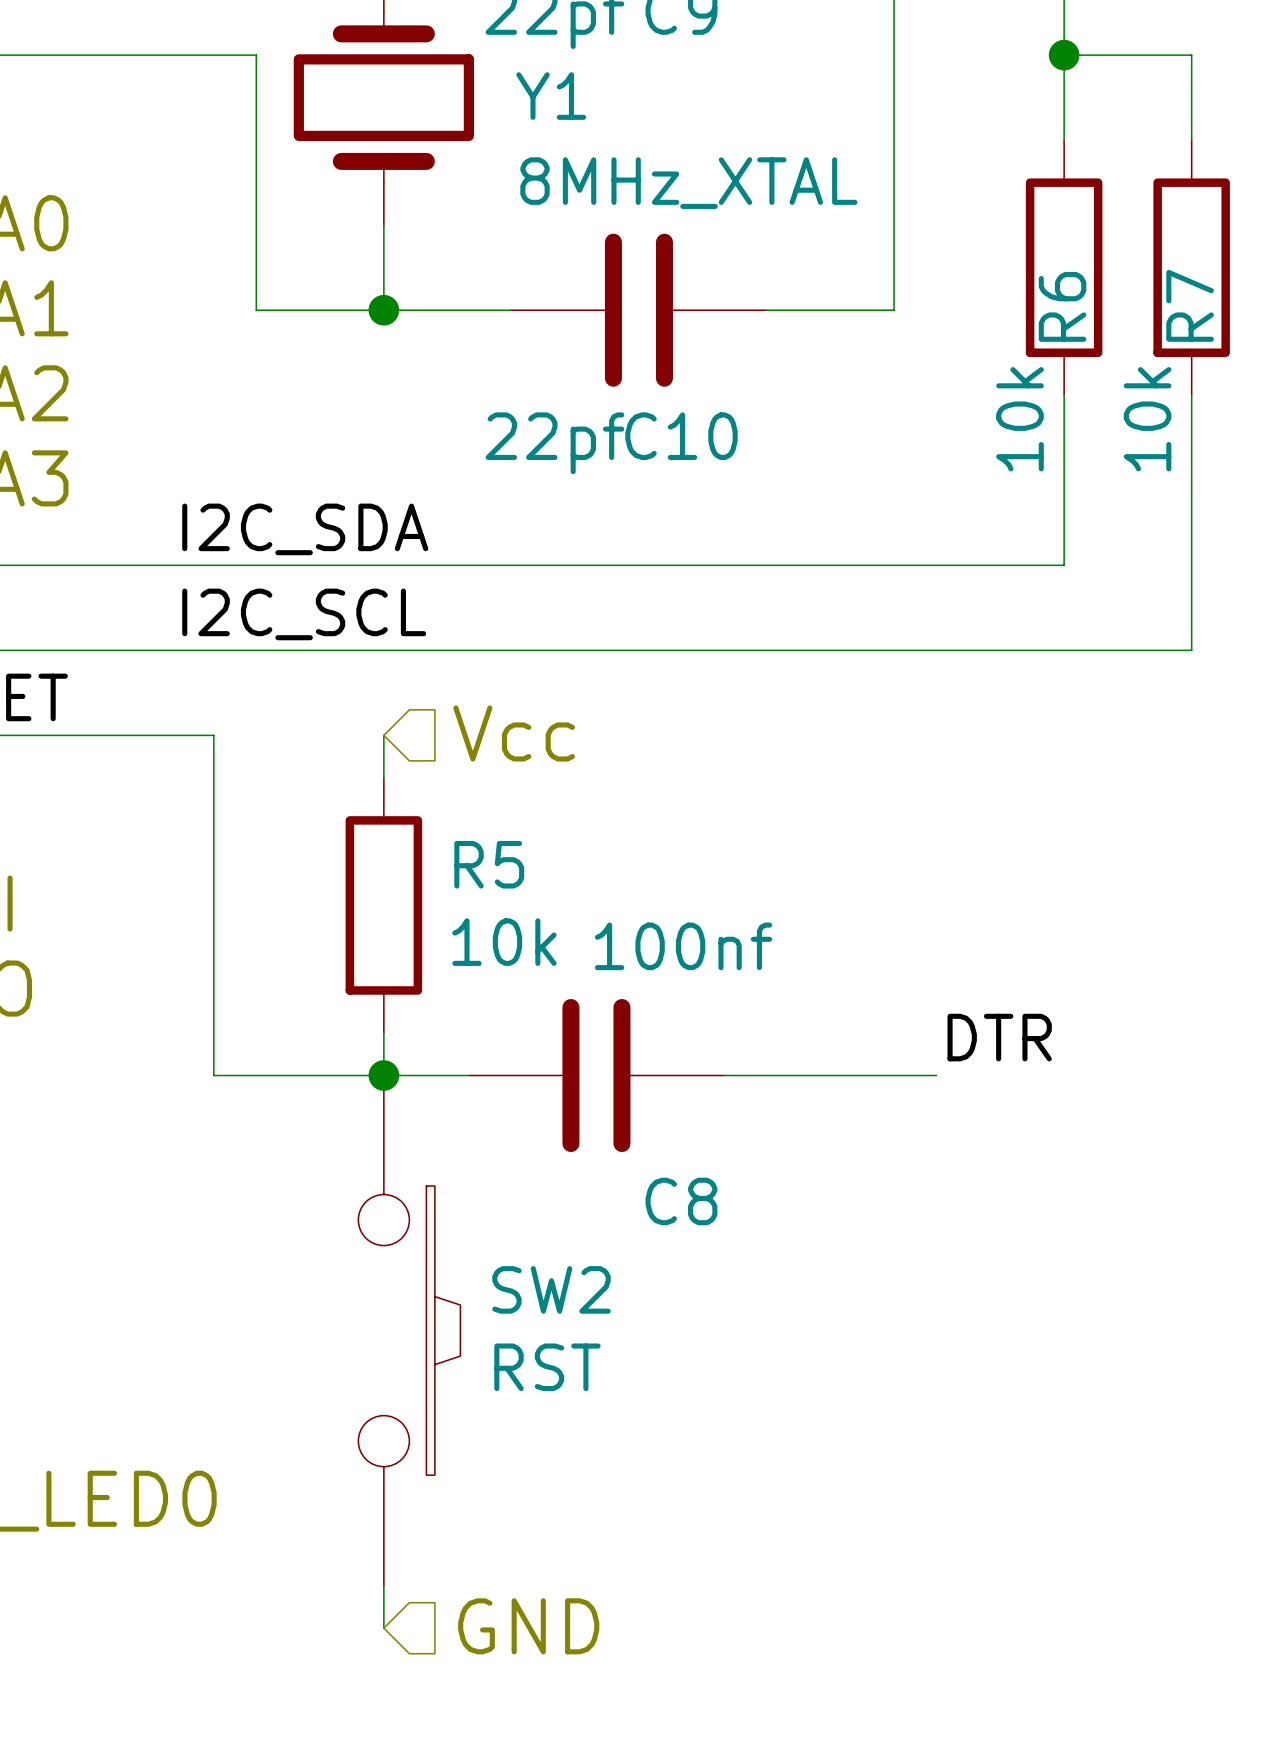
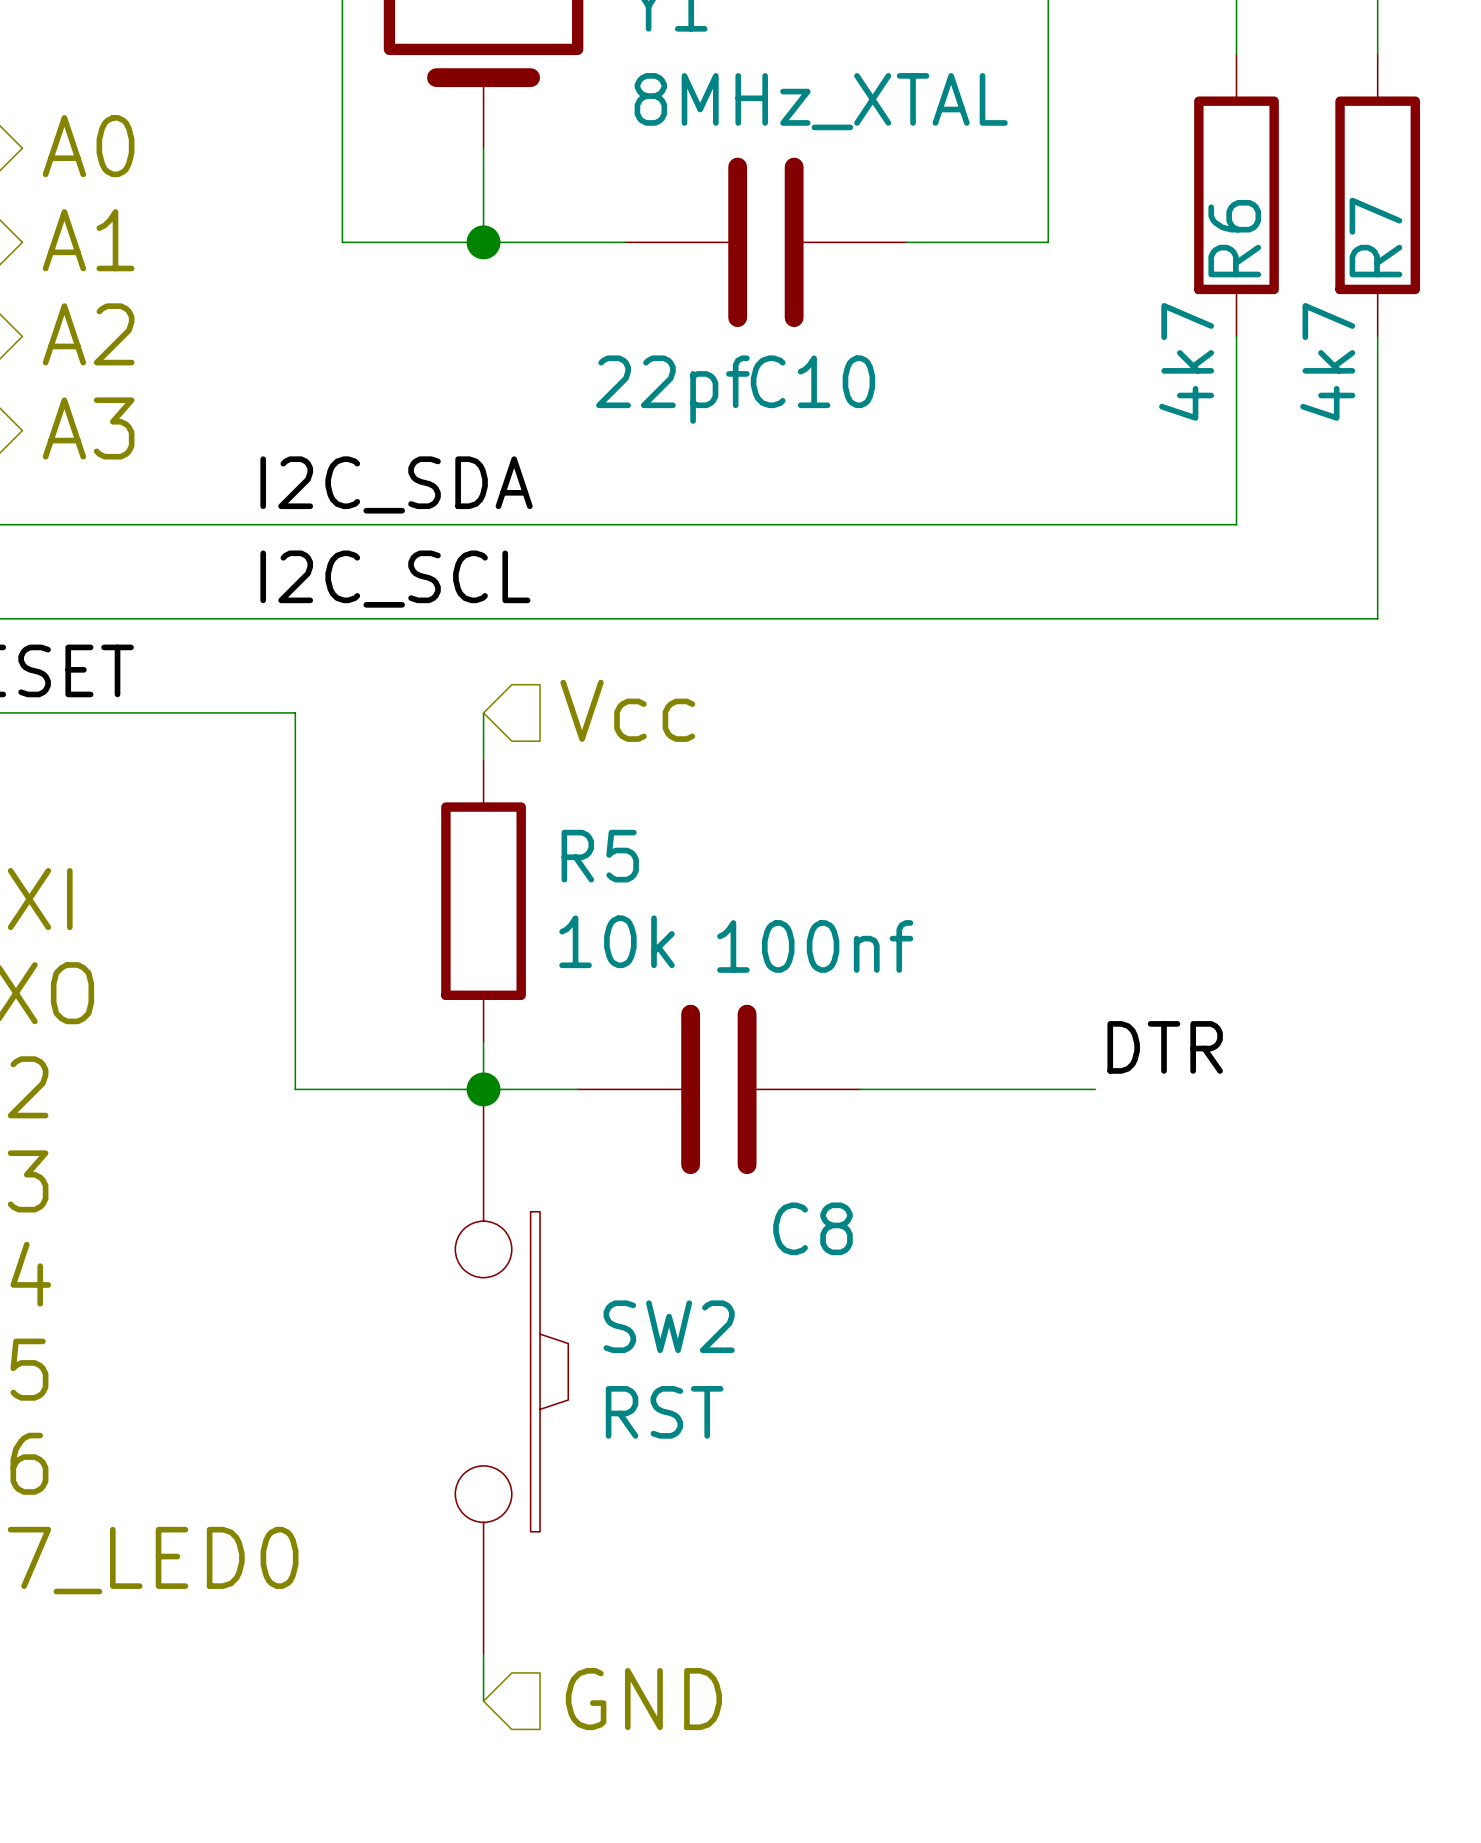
R6 value: 10k (1020, 419) -> 4k7 (1186, 361)
R7 value: 10k (1147, 419) -> 4k7 (1327, 361)

